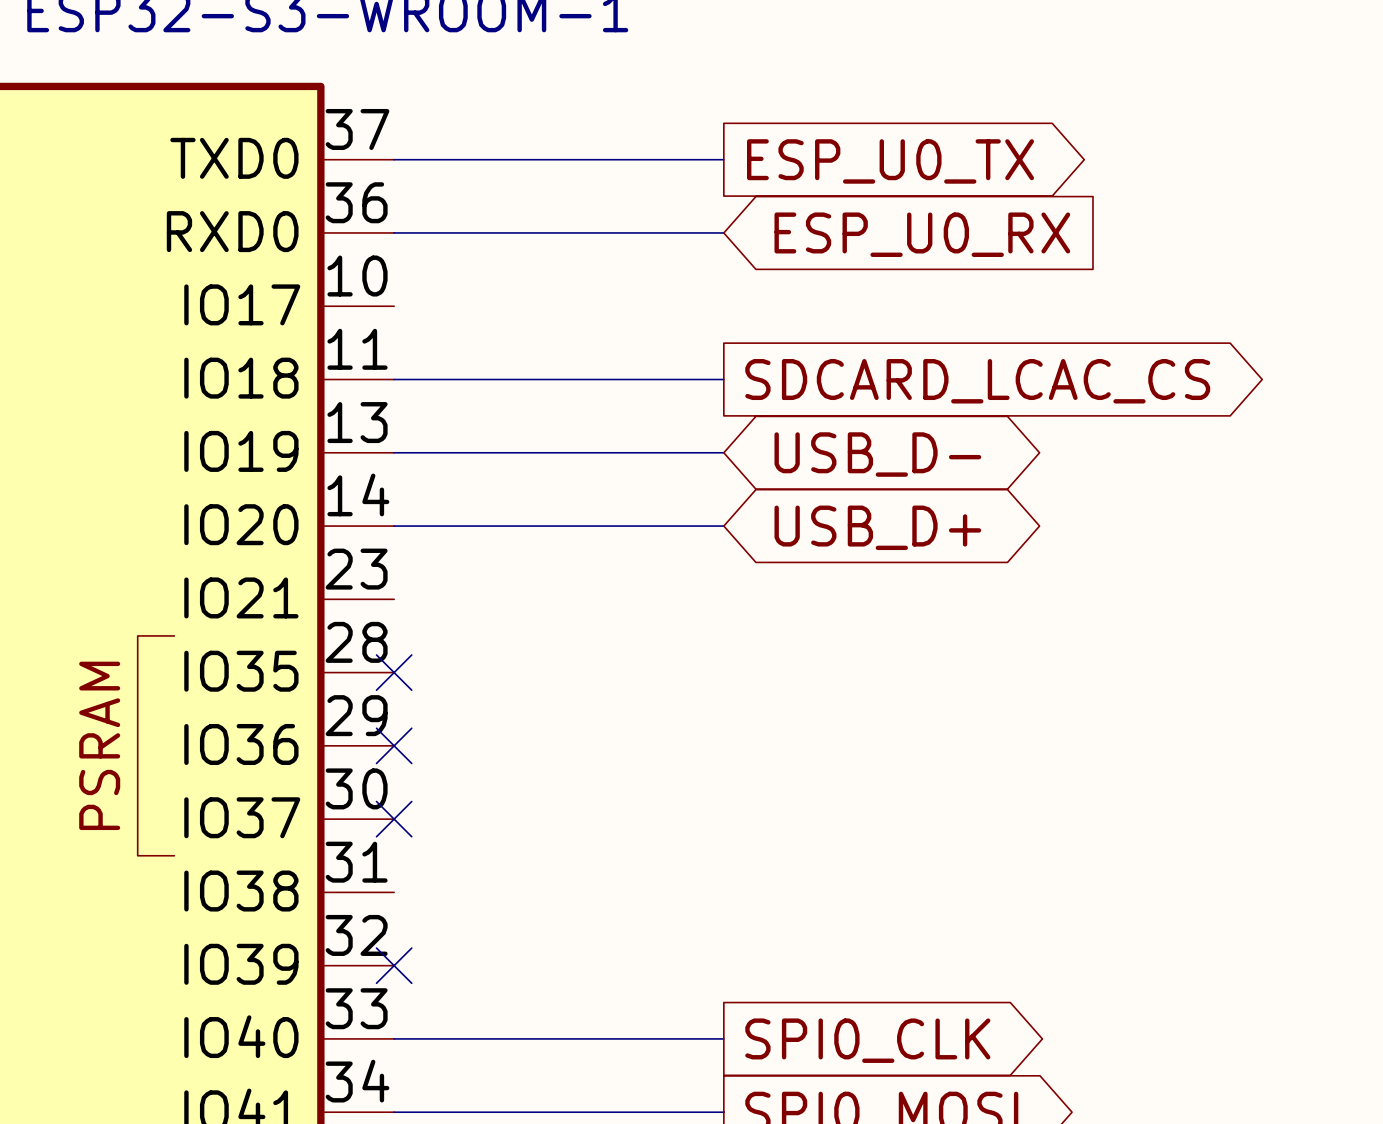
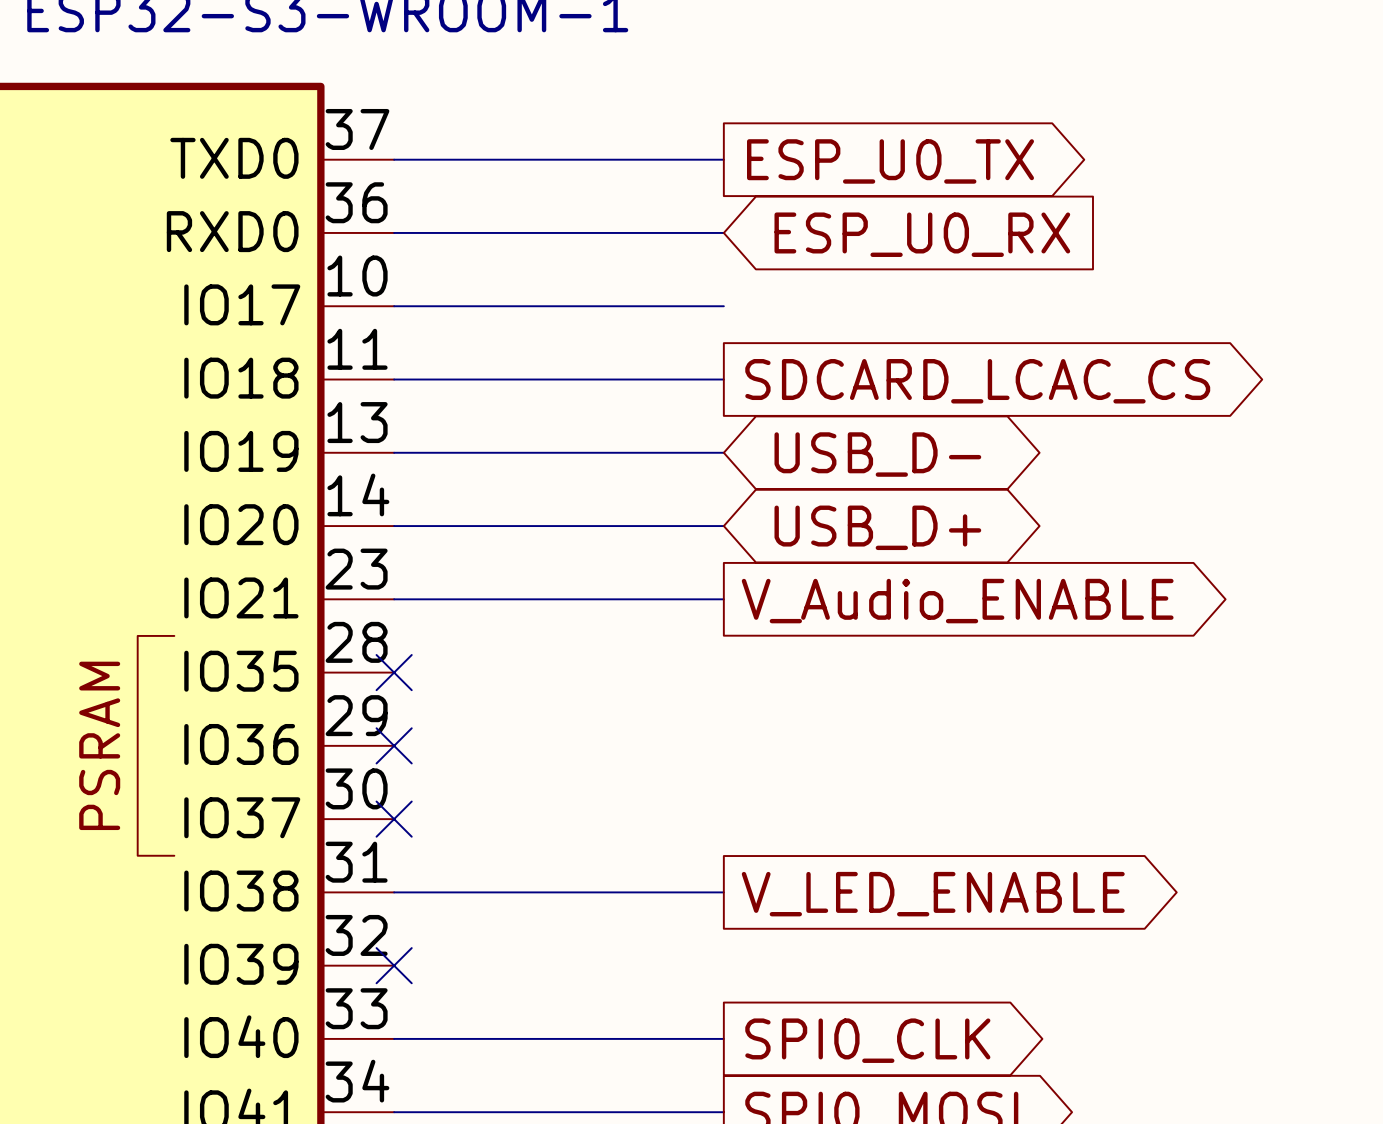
wire: none -> (394, 306) (723, 306)
wire: none -> (394, 599) (723, 599)
global label: none -> V_Audio_ENABLE (957, 601)
wire: none -> (394, 892) (723, 892)
global label: none -> V_LED_ENABLE (933, 894)

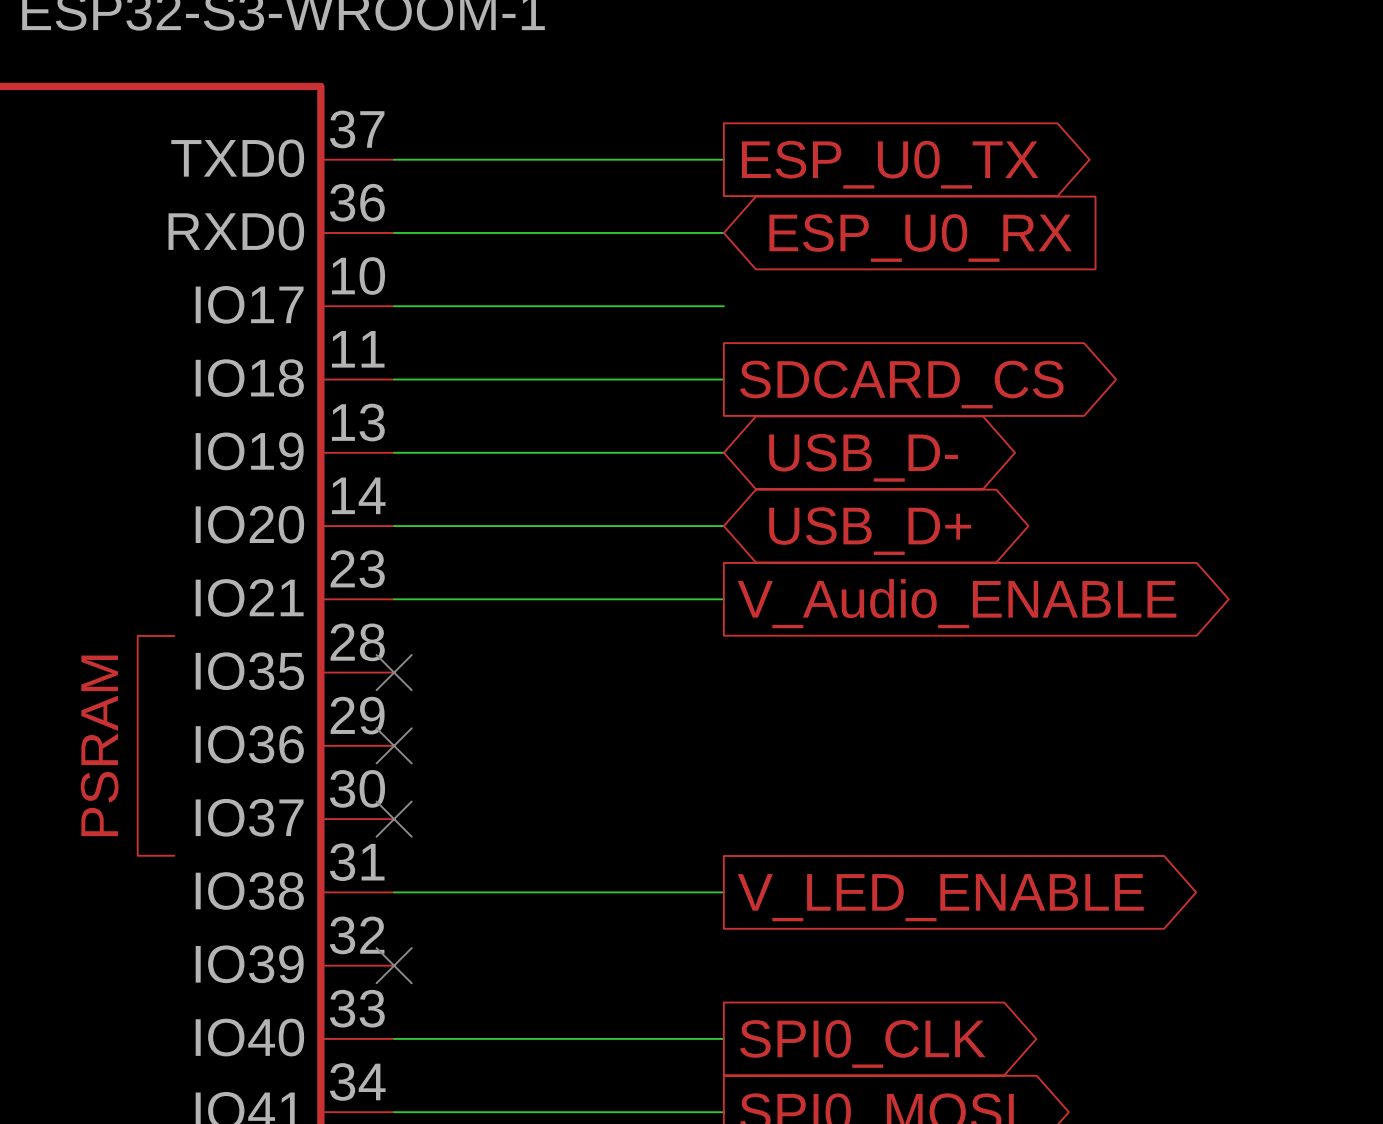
global label: SDCARD_LCAC_CS (977, 381) -> SDCARD_CS (901, 384)

